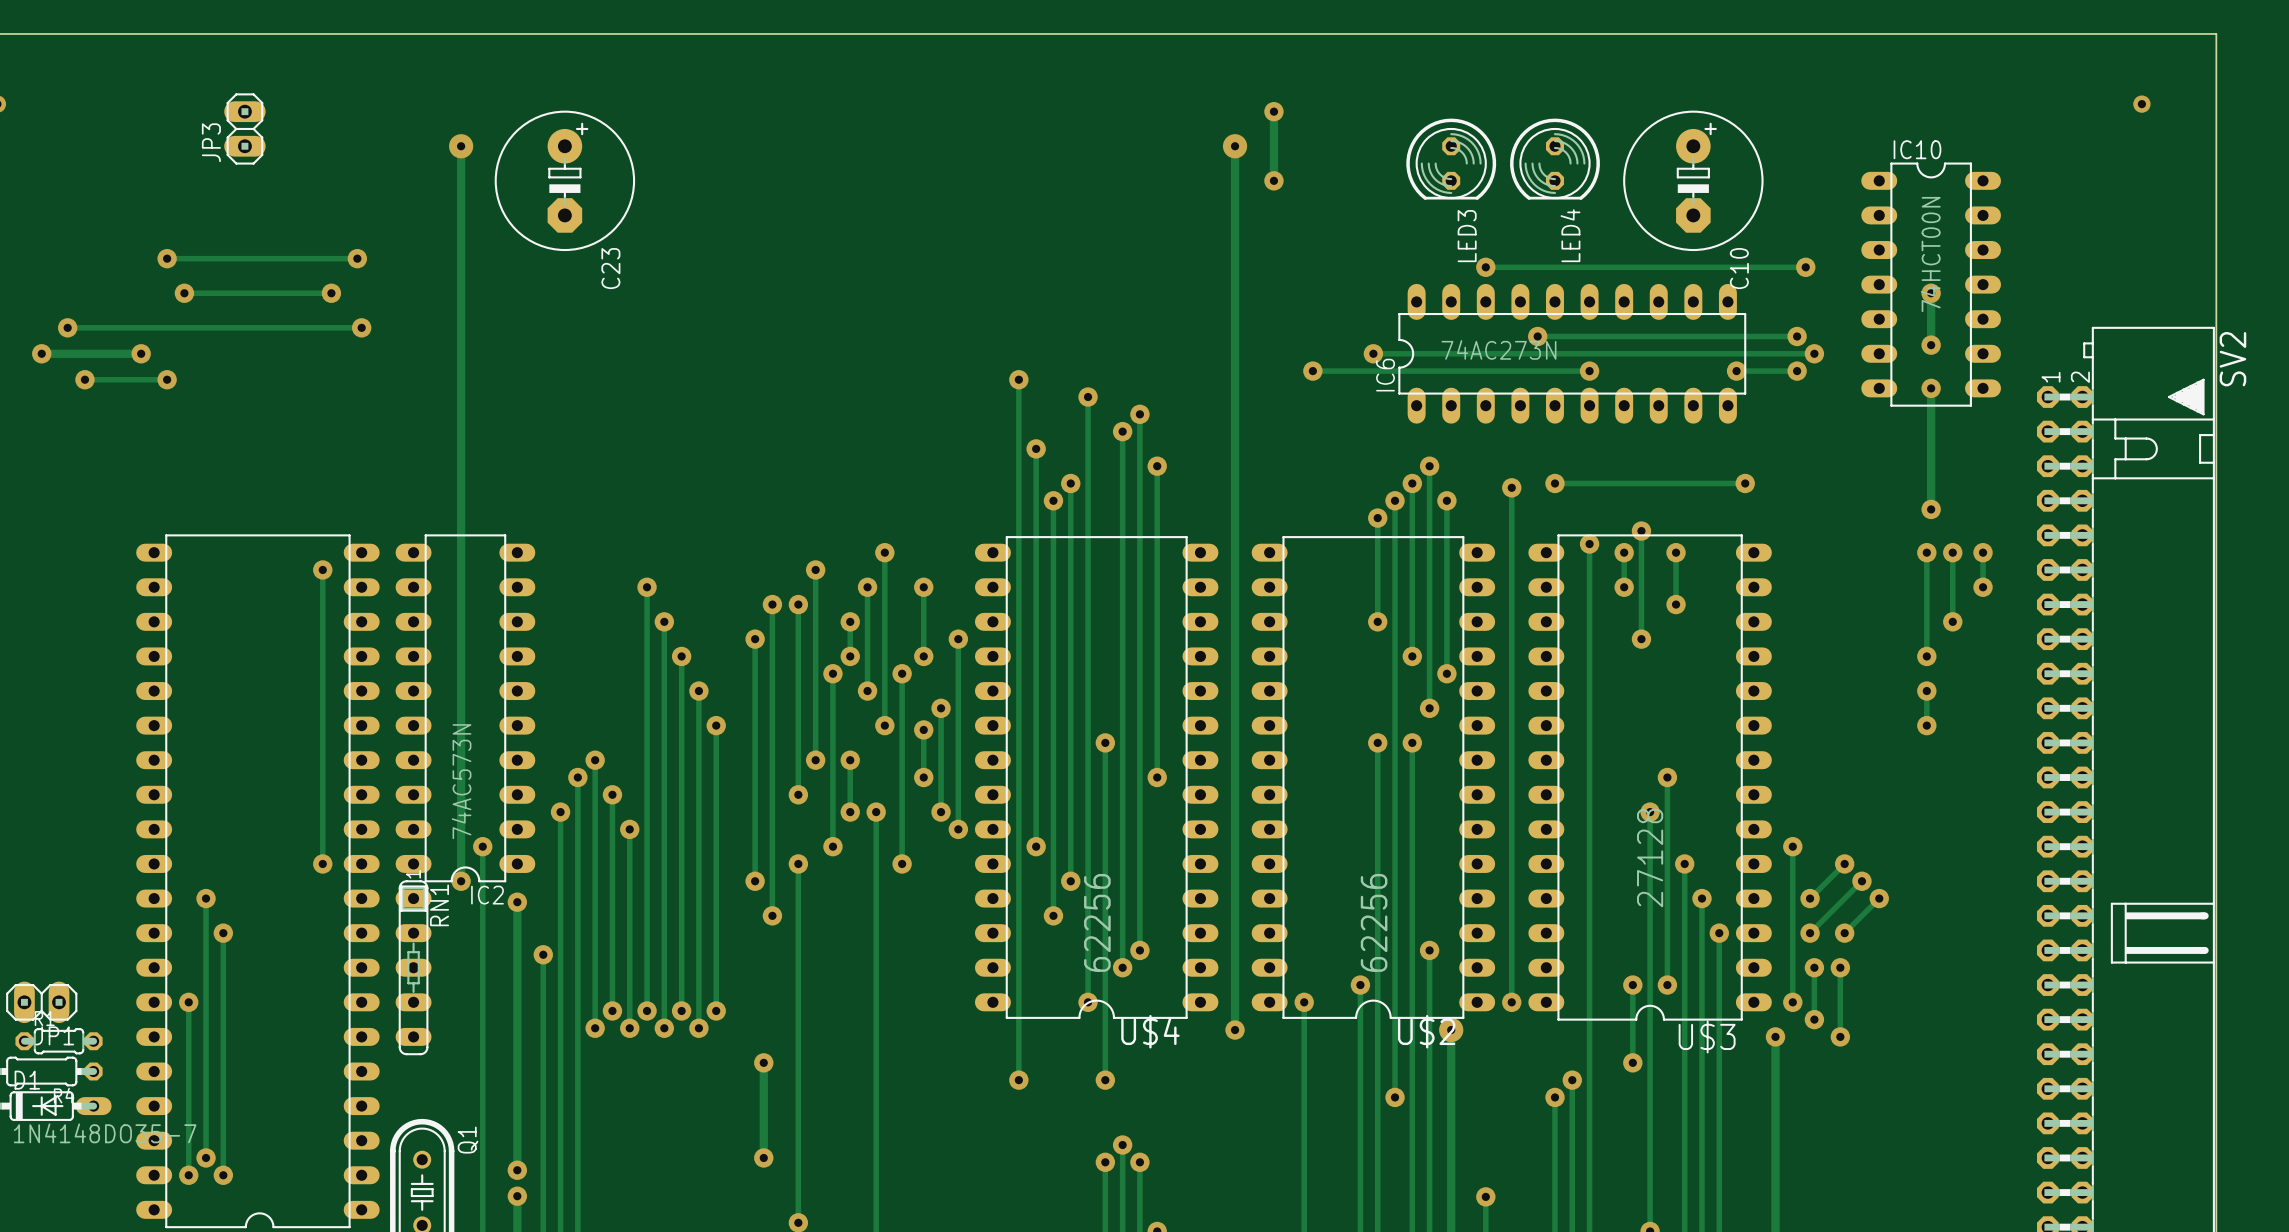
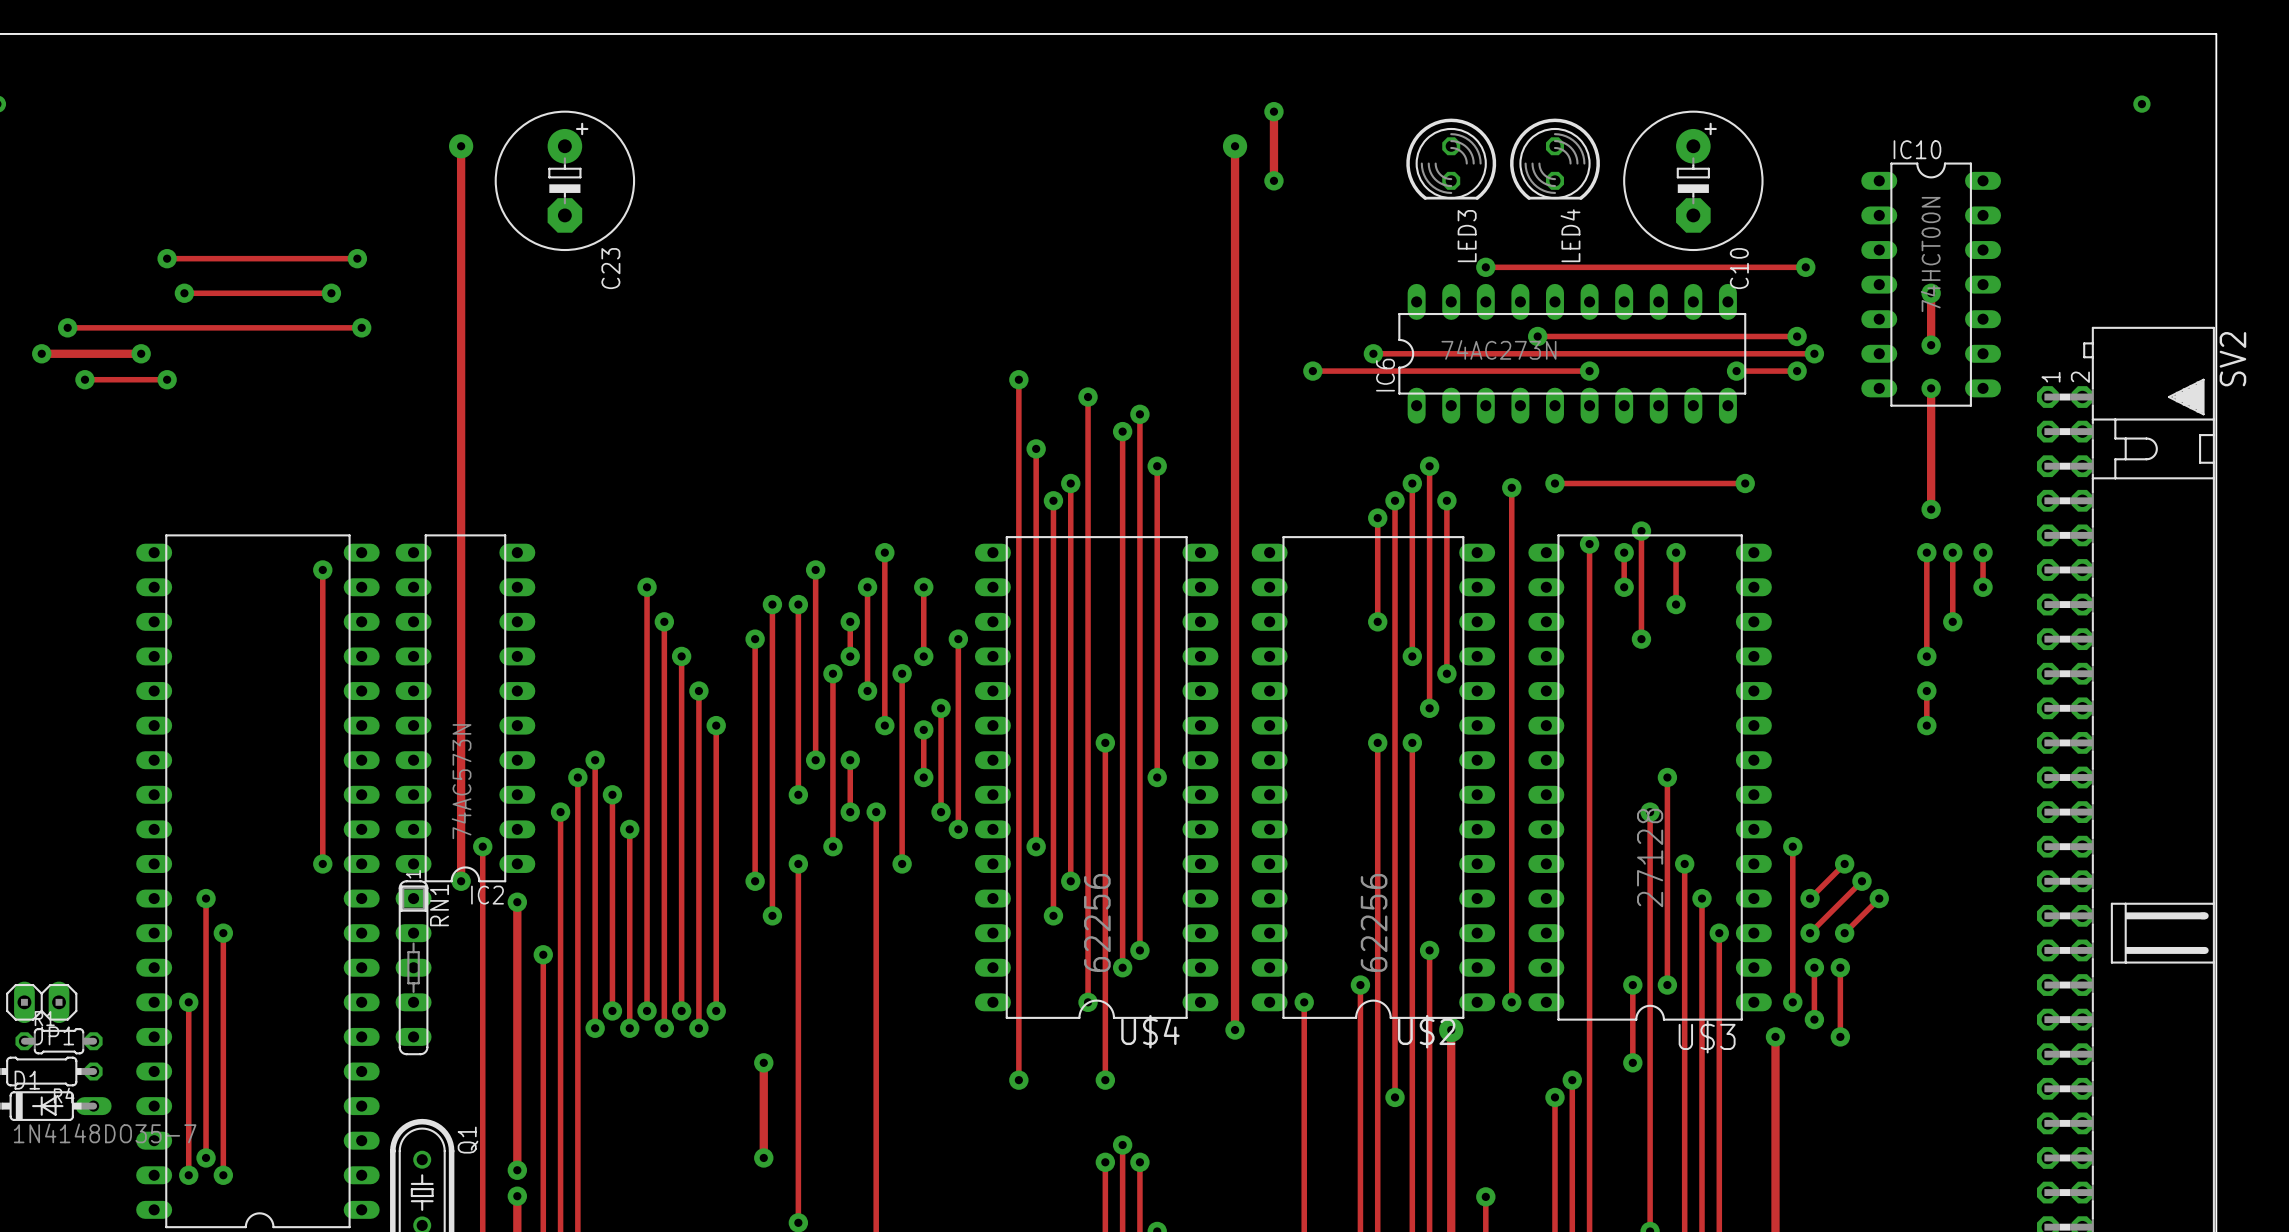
JP3: (244, 128) -> none

